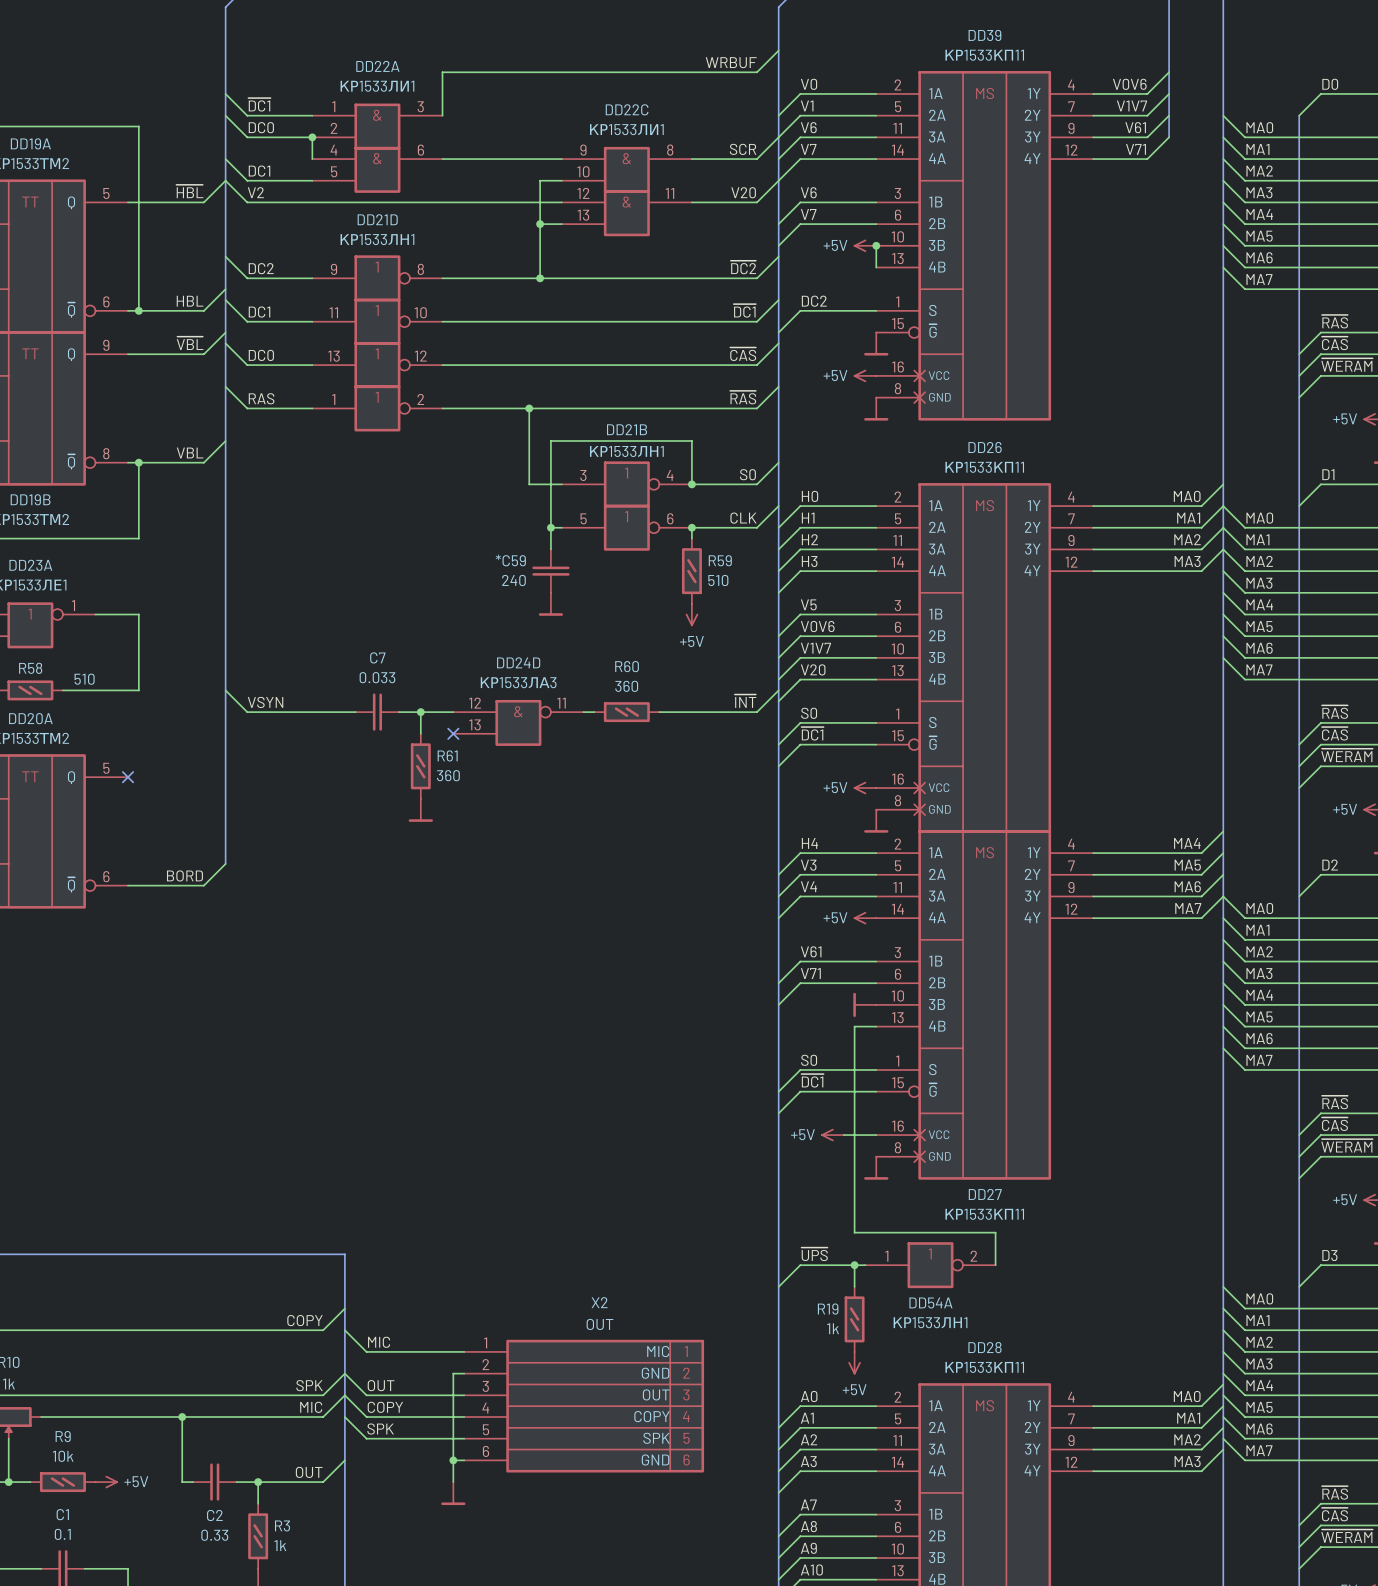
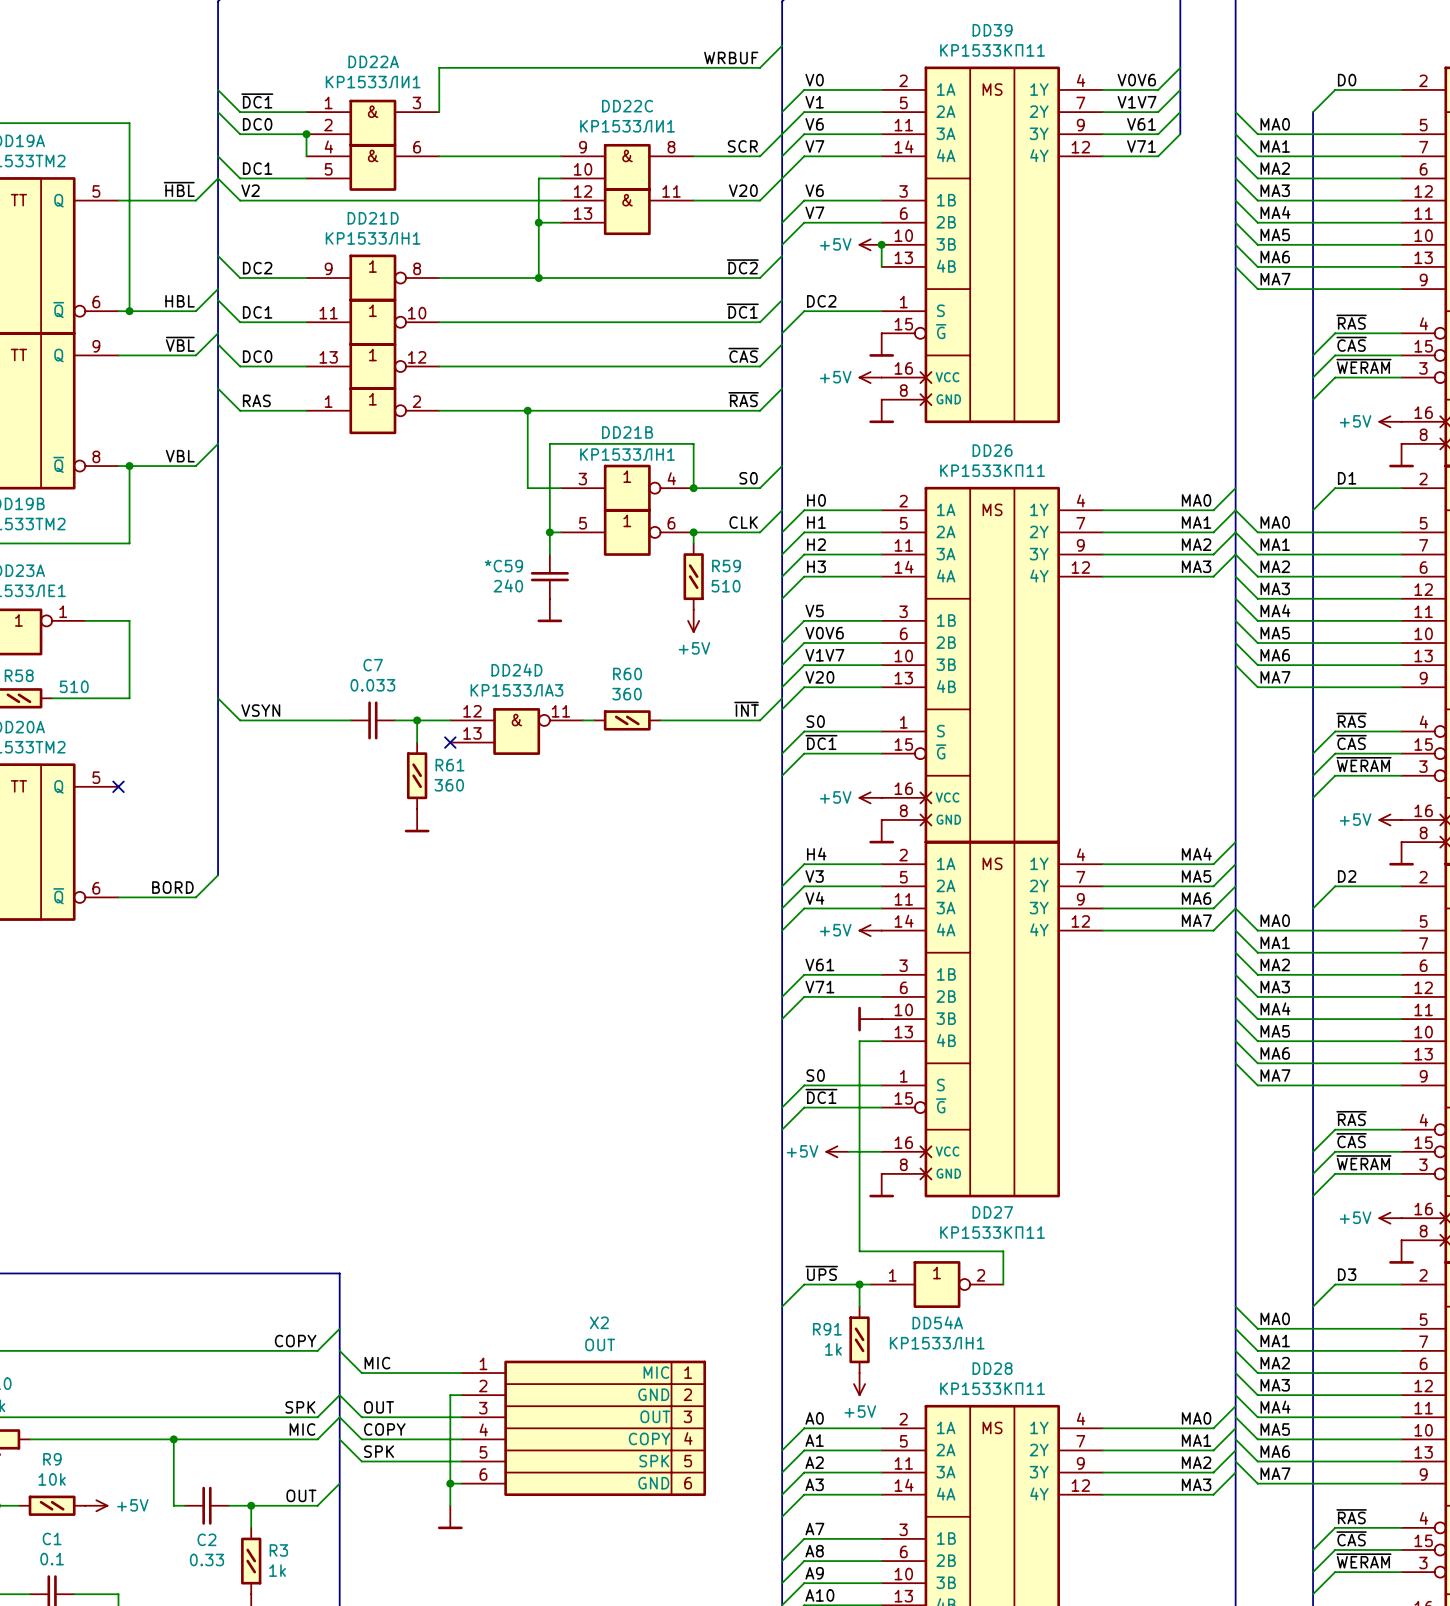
R19 name: R19 (828, 1309) -> R91 (827, 1329)

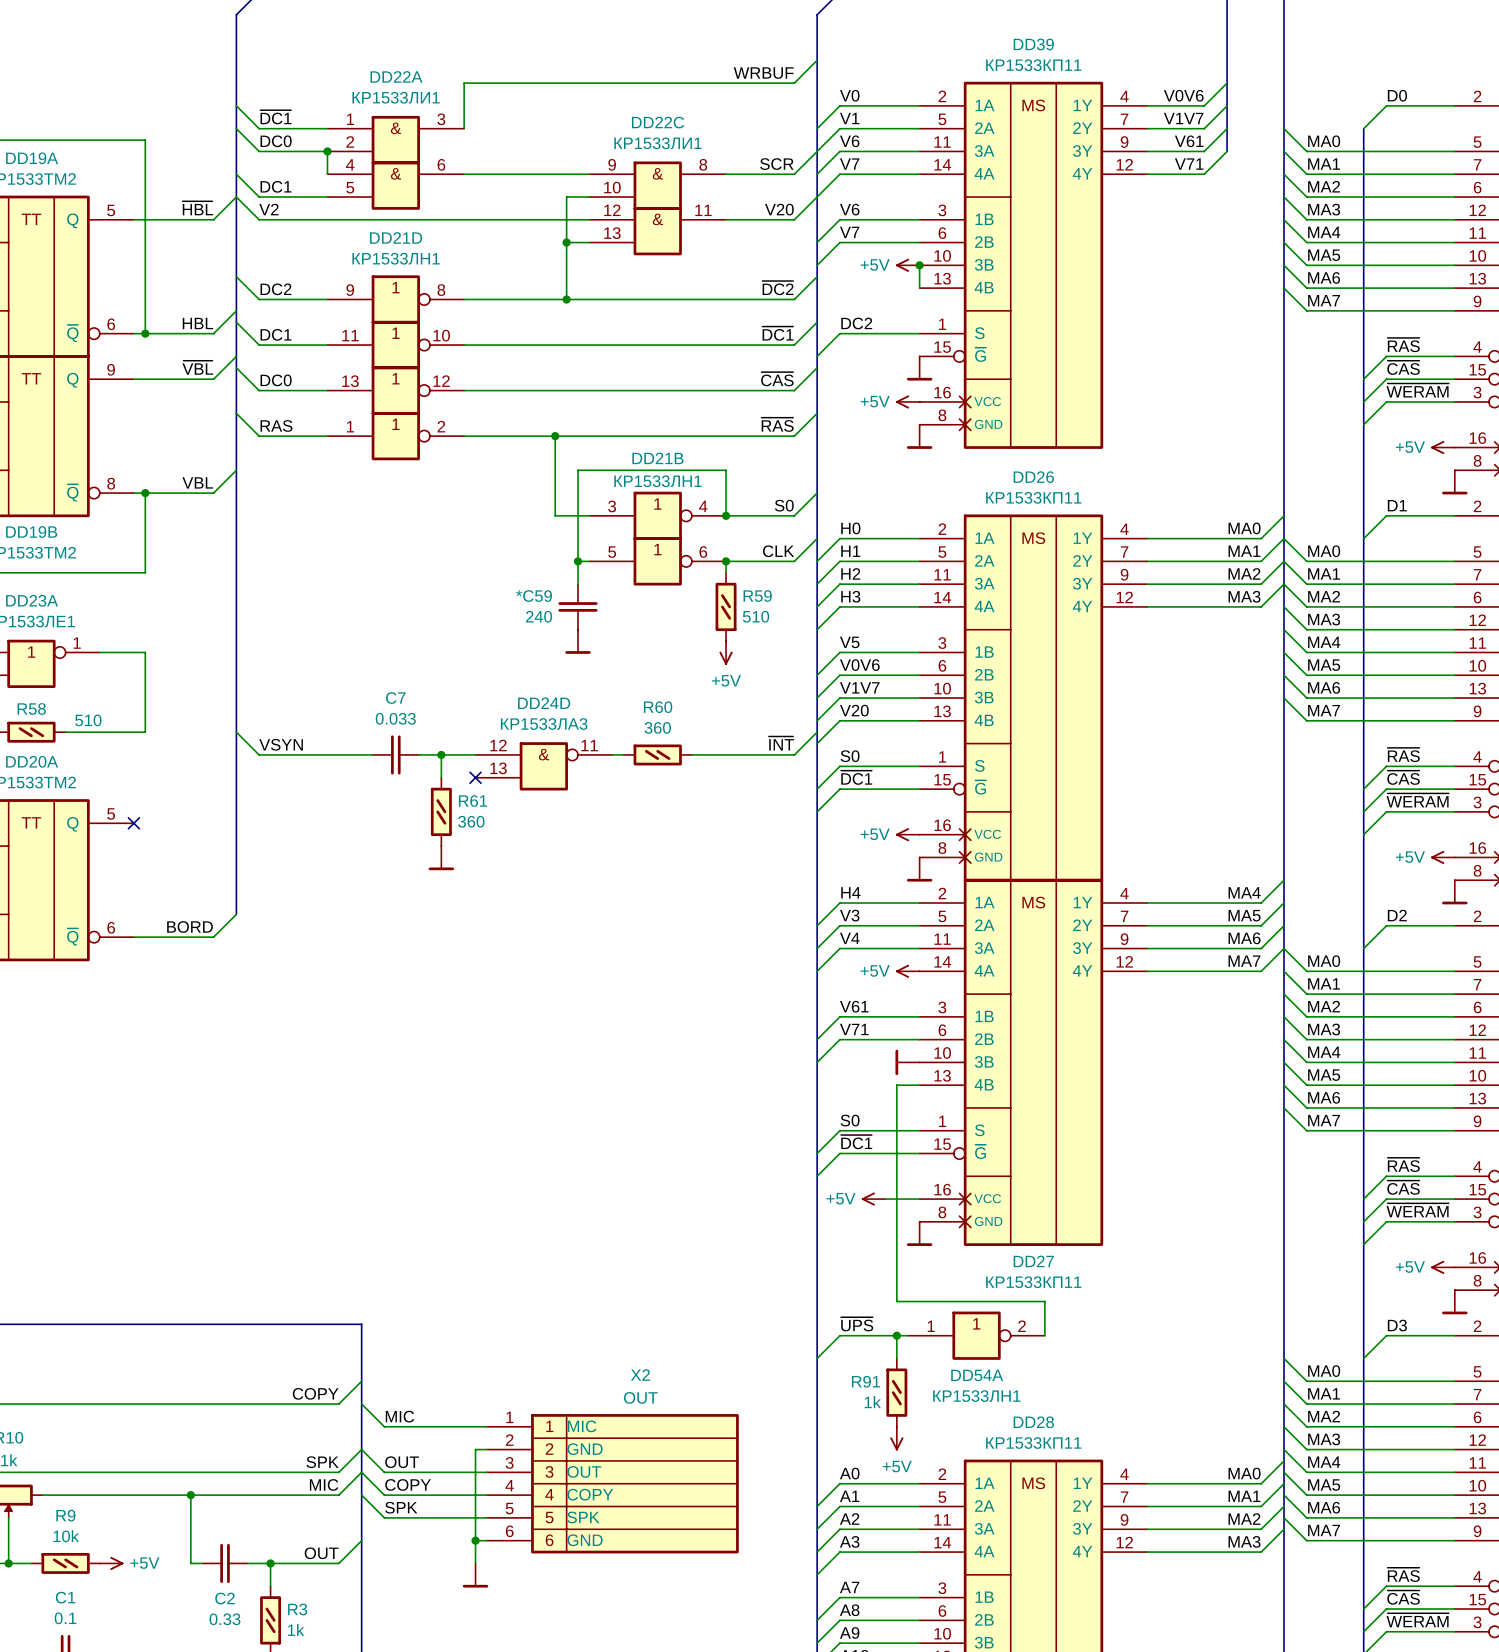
X2 symbol: [461, 1360, 707, 1497] -> [486, 1414, 739, 1554]
X2 text position: MIC (656, 1372) -> MIC (582, 1426)
X2 text position: GND (653, 1394) -> GND (585, 1449)
X2 text position: OUT (655, 1416) -> OUT (584, 1471)
X2 text position: COPY (649, 1438) -> COPY (590, 1494)
X2 text position: SPK (654, 1461) -> SPK (583, 1517)
X2 text position: GND (653, 1483) -> GND (585, 1540)

